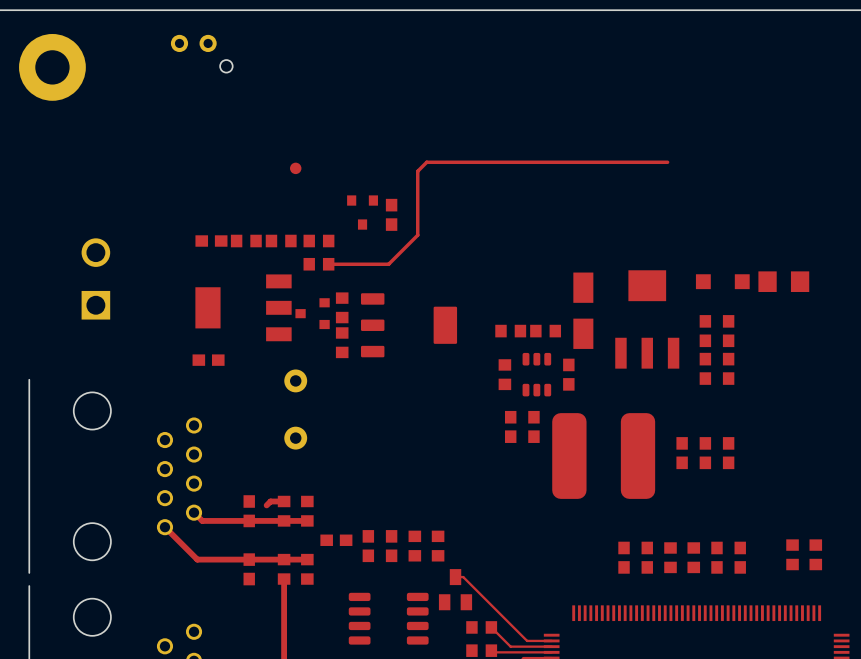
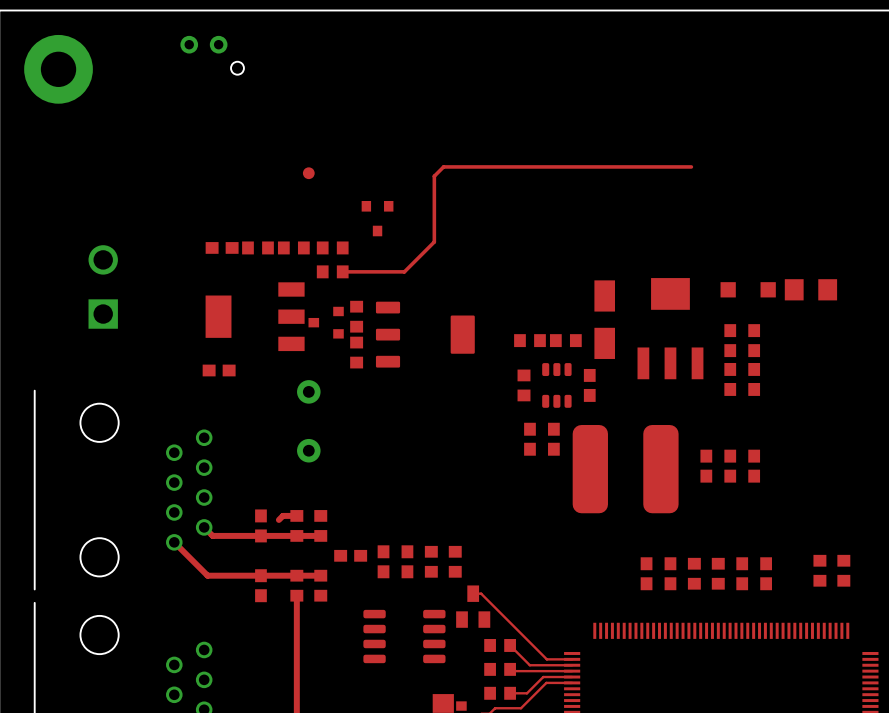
part: (391, 214) -> none

